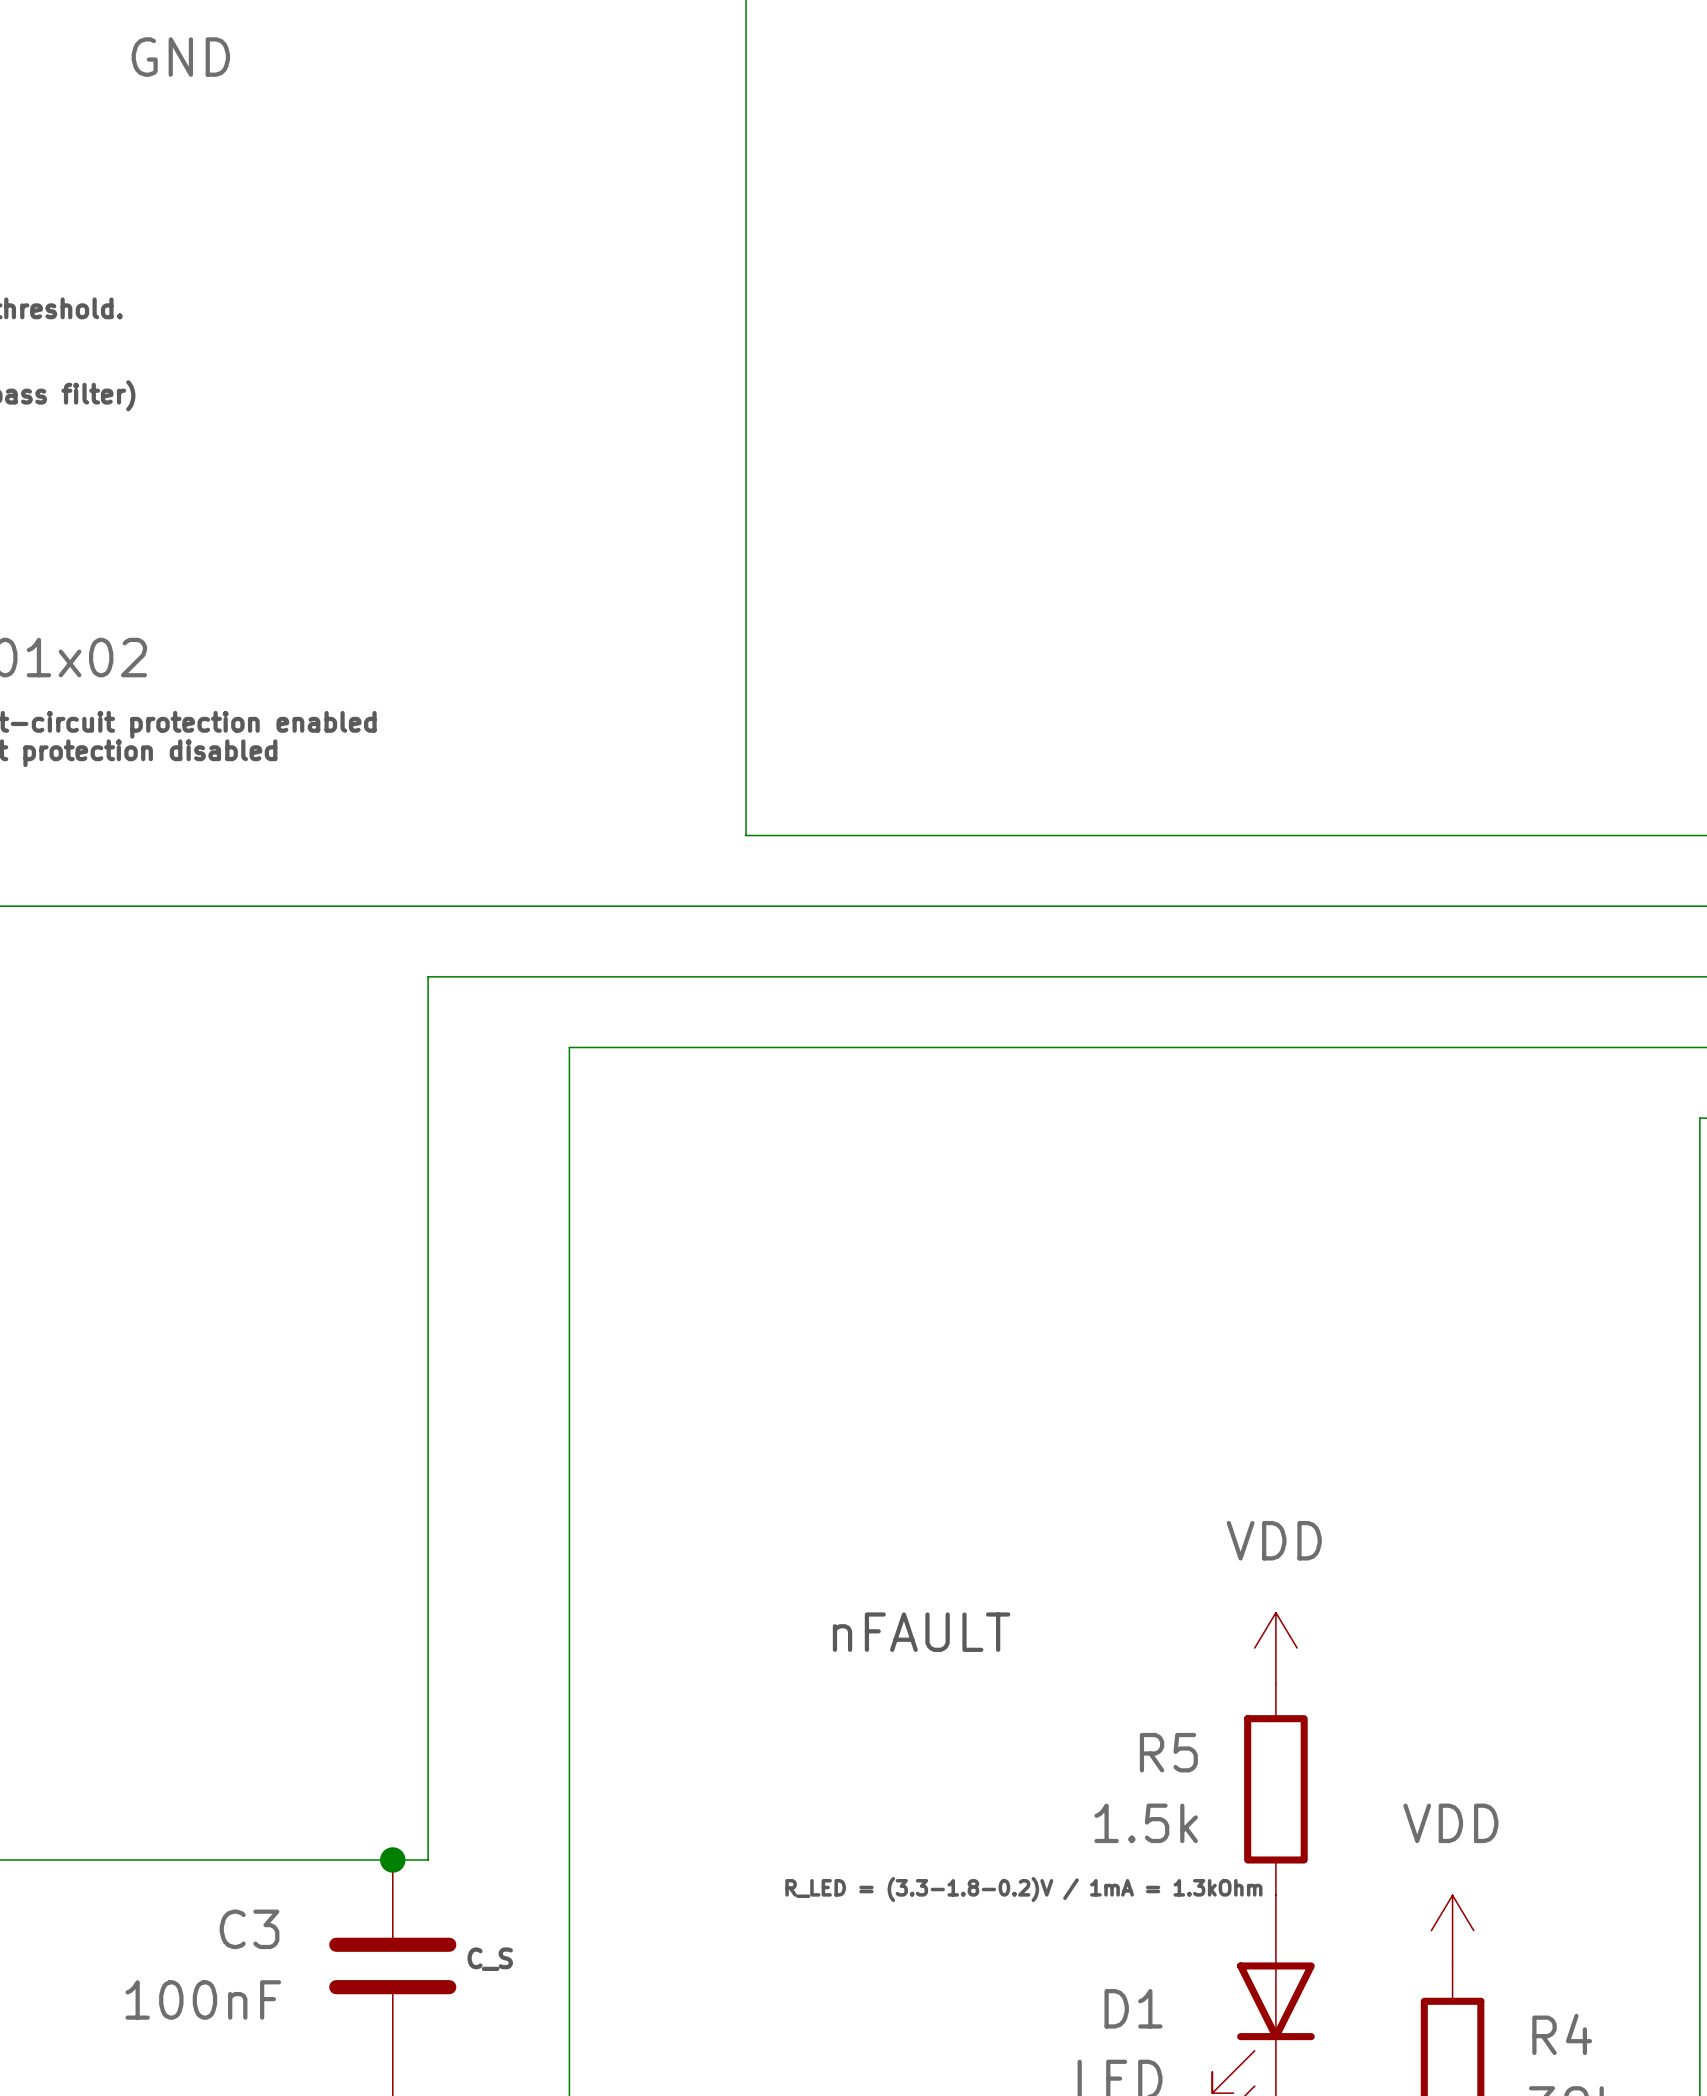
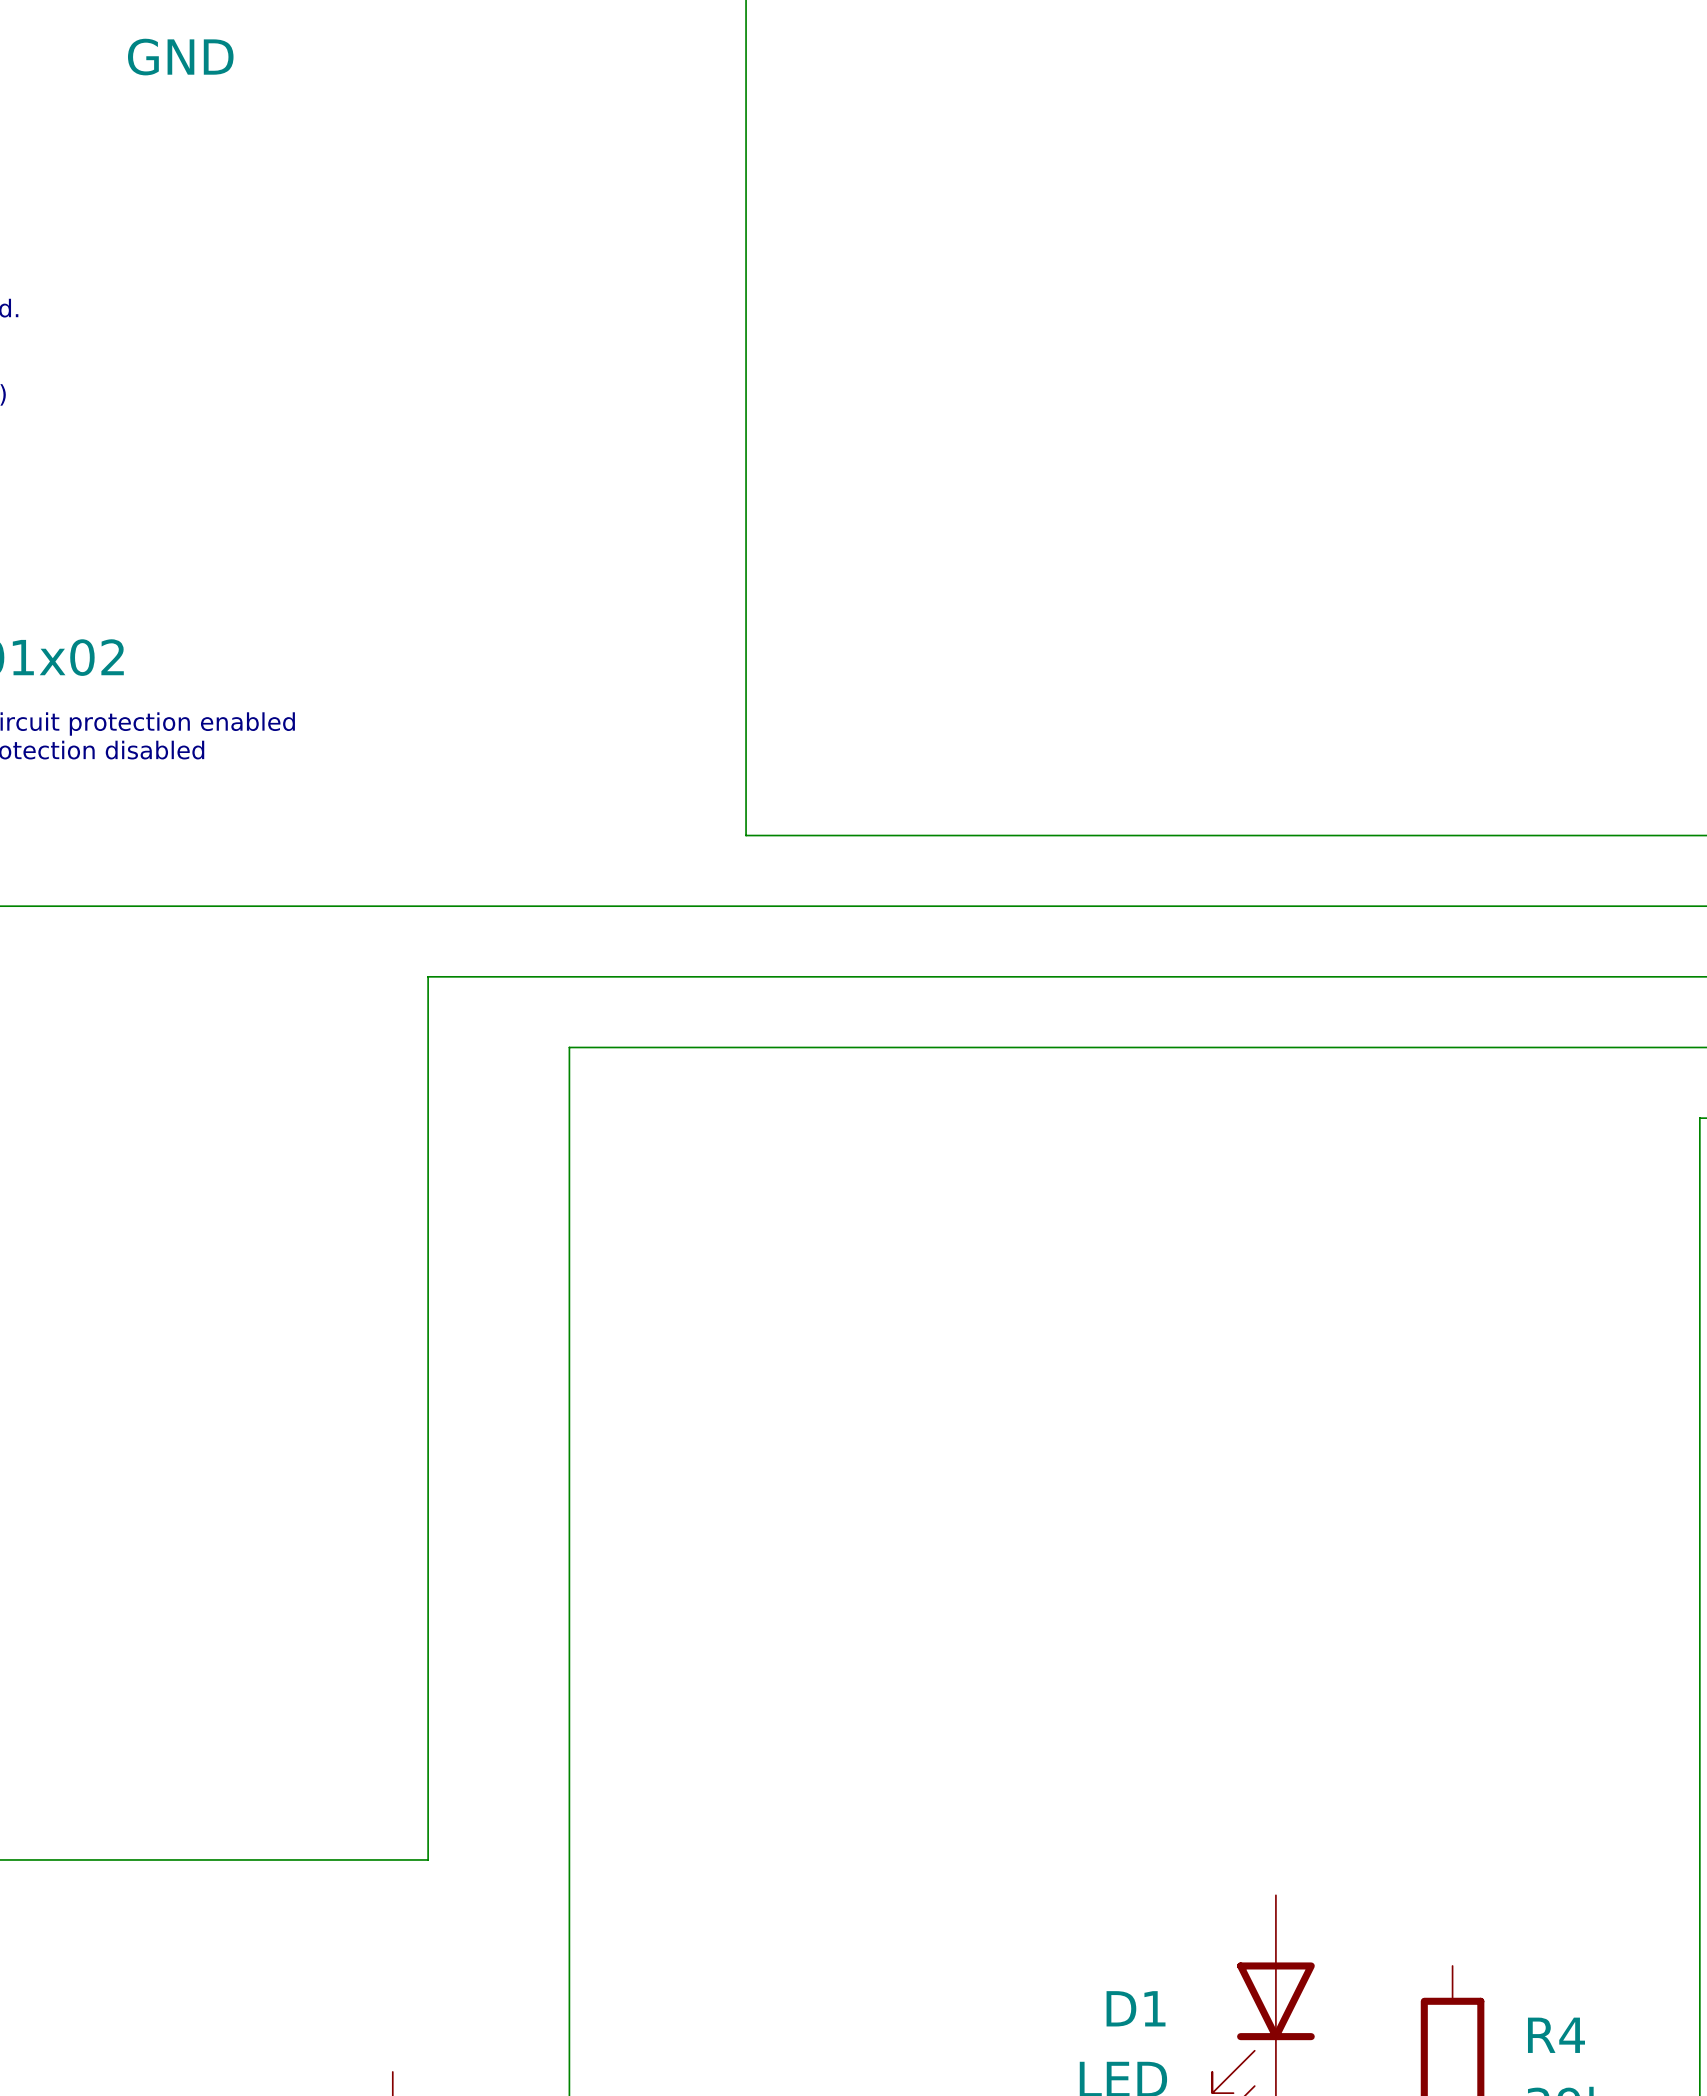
text: nFAULT (921, 1632) -> none
power symbol: VDD (1275, 1648) -> none
R5: 1.5k (1275, 1789) -> none
junction: (392, 1859) -> none
text: R_LED = (3.3-1.8-0.2)V / 1mA = 1.3kOhm (1023, 1889) -> none
power symbol: VDD (1452, 1930) -> none
text: C_S (490, 1959) -> none
C3: 100nF (392, 1965) -> none

